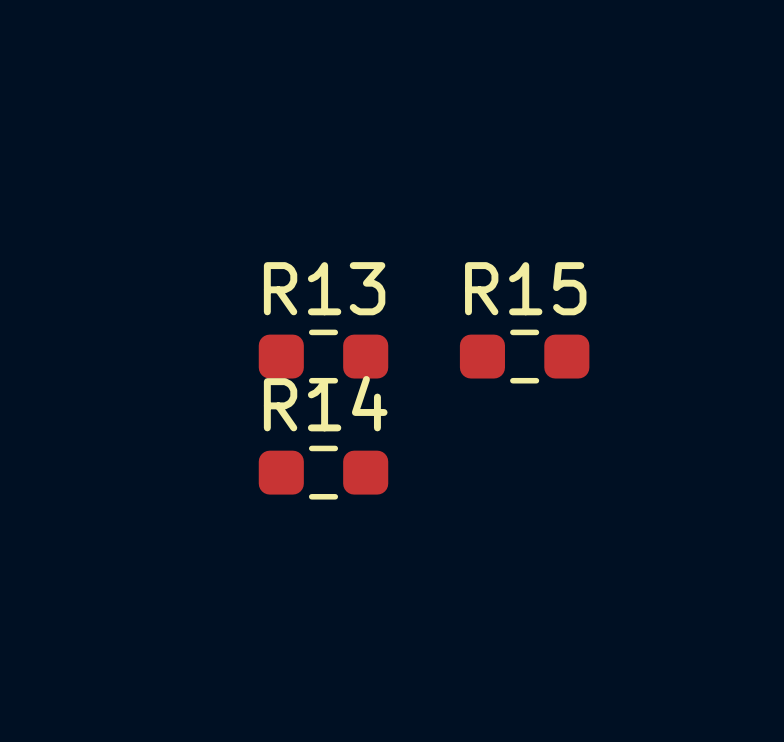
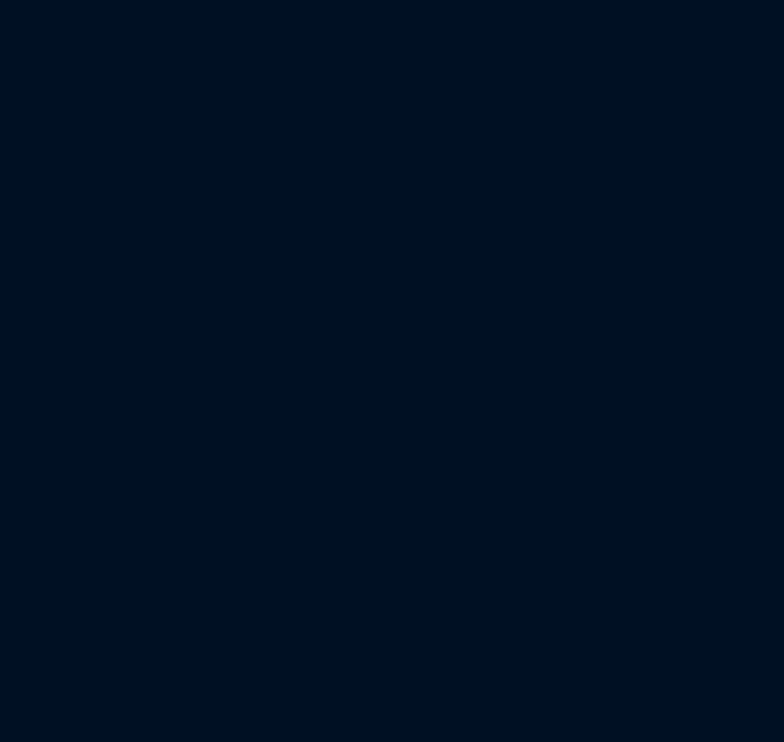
R13: (323, 356) -> none
R15: (524, 356) -> none
R14: (323, 472) -> none

